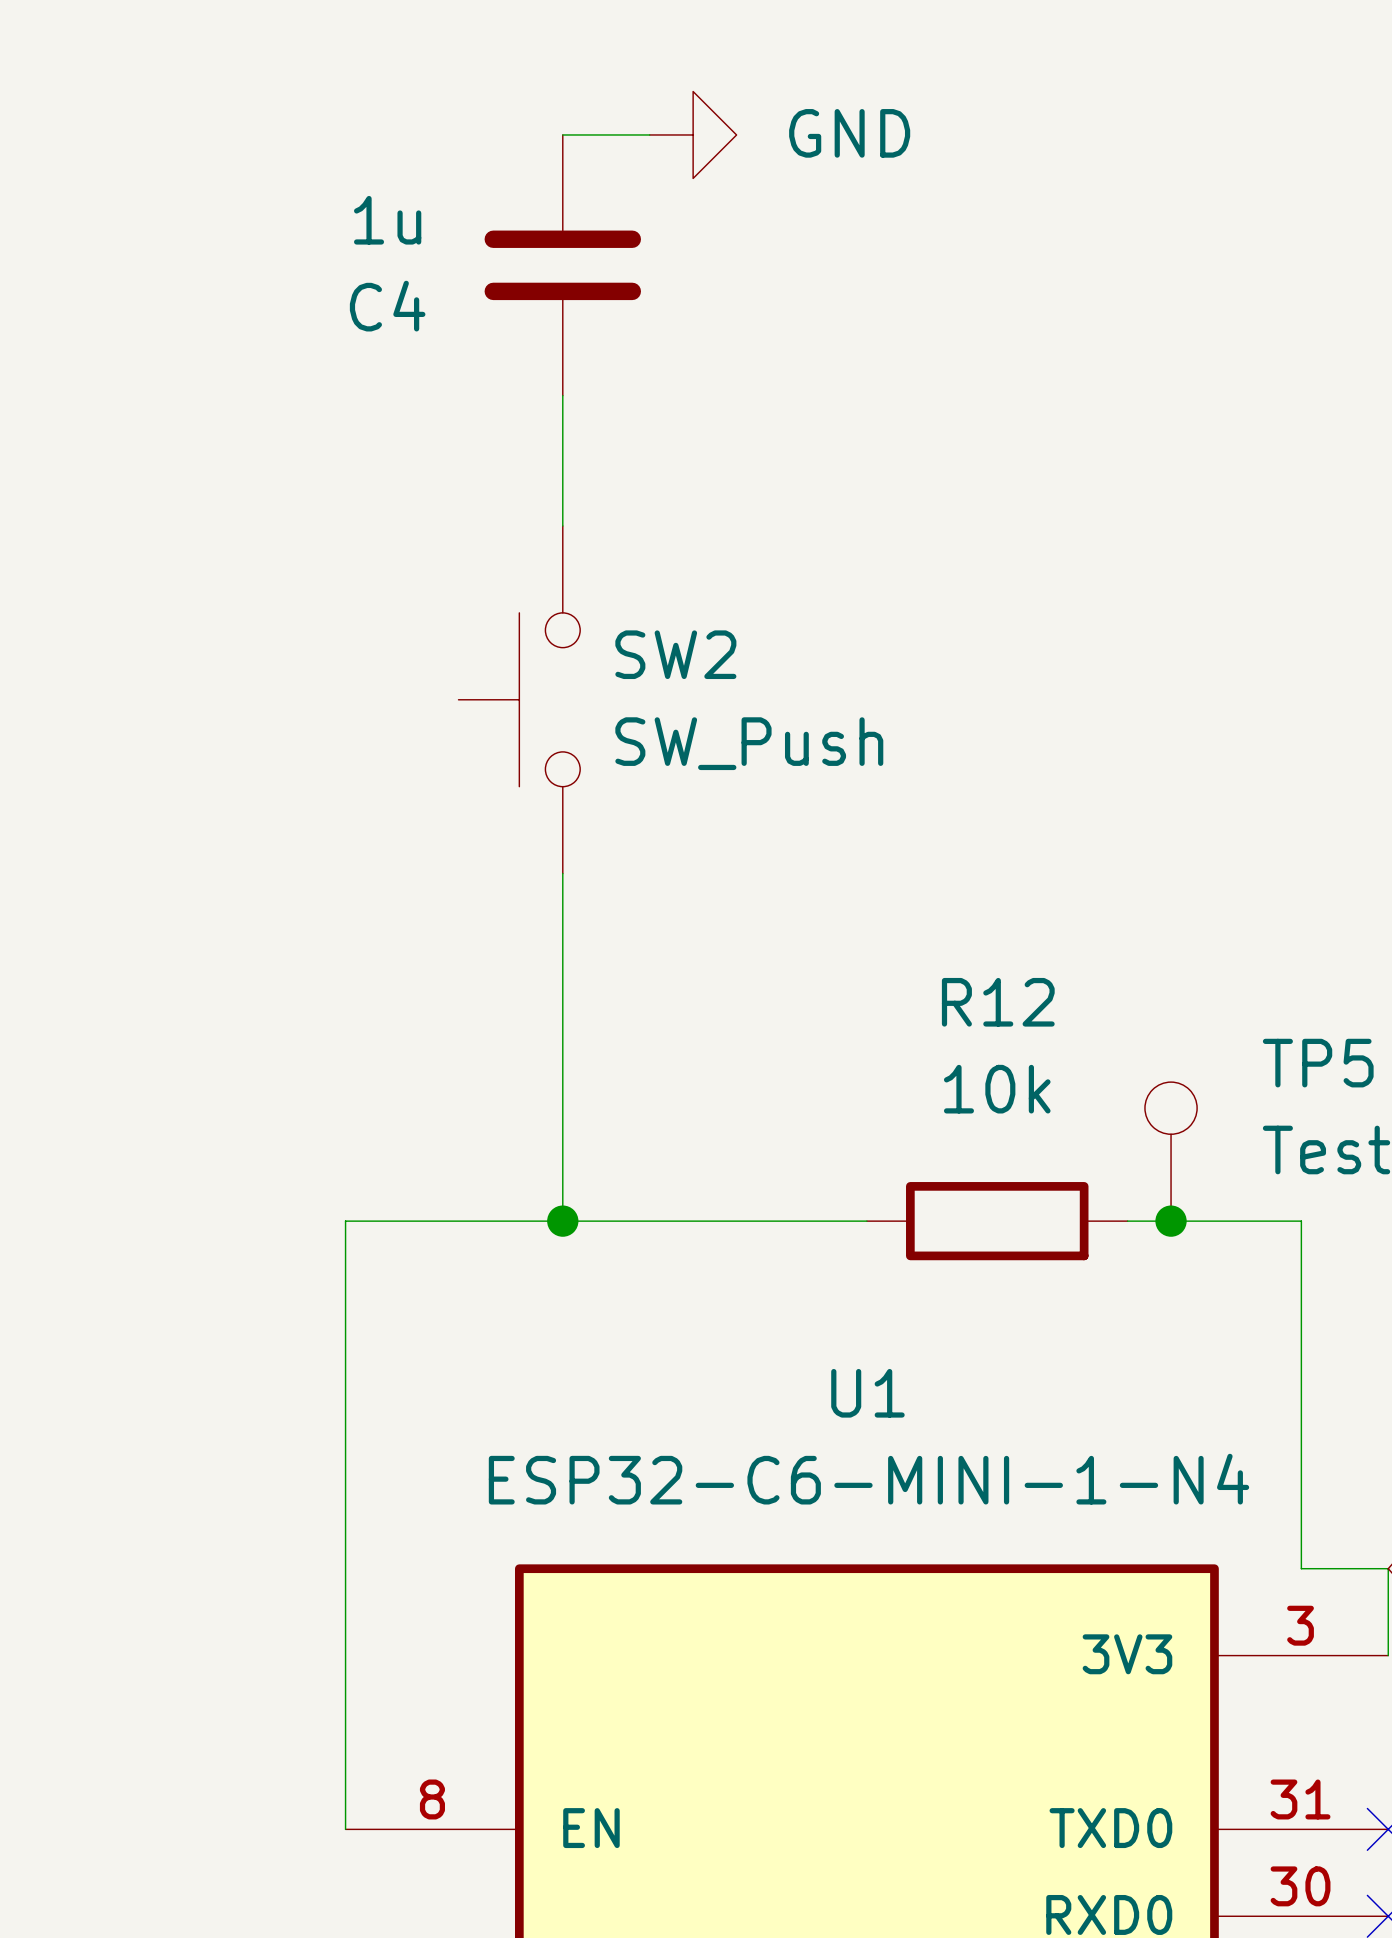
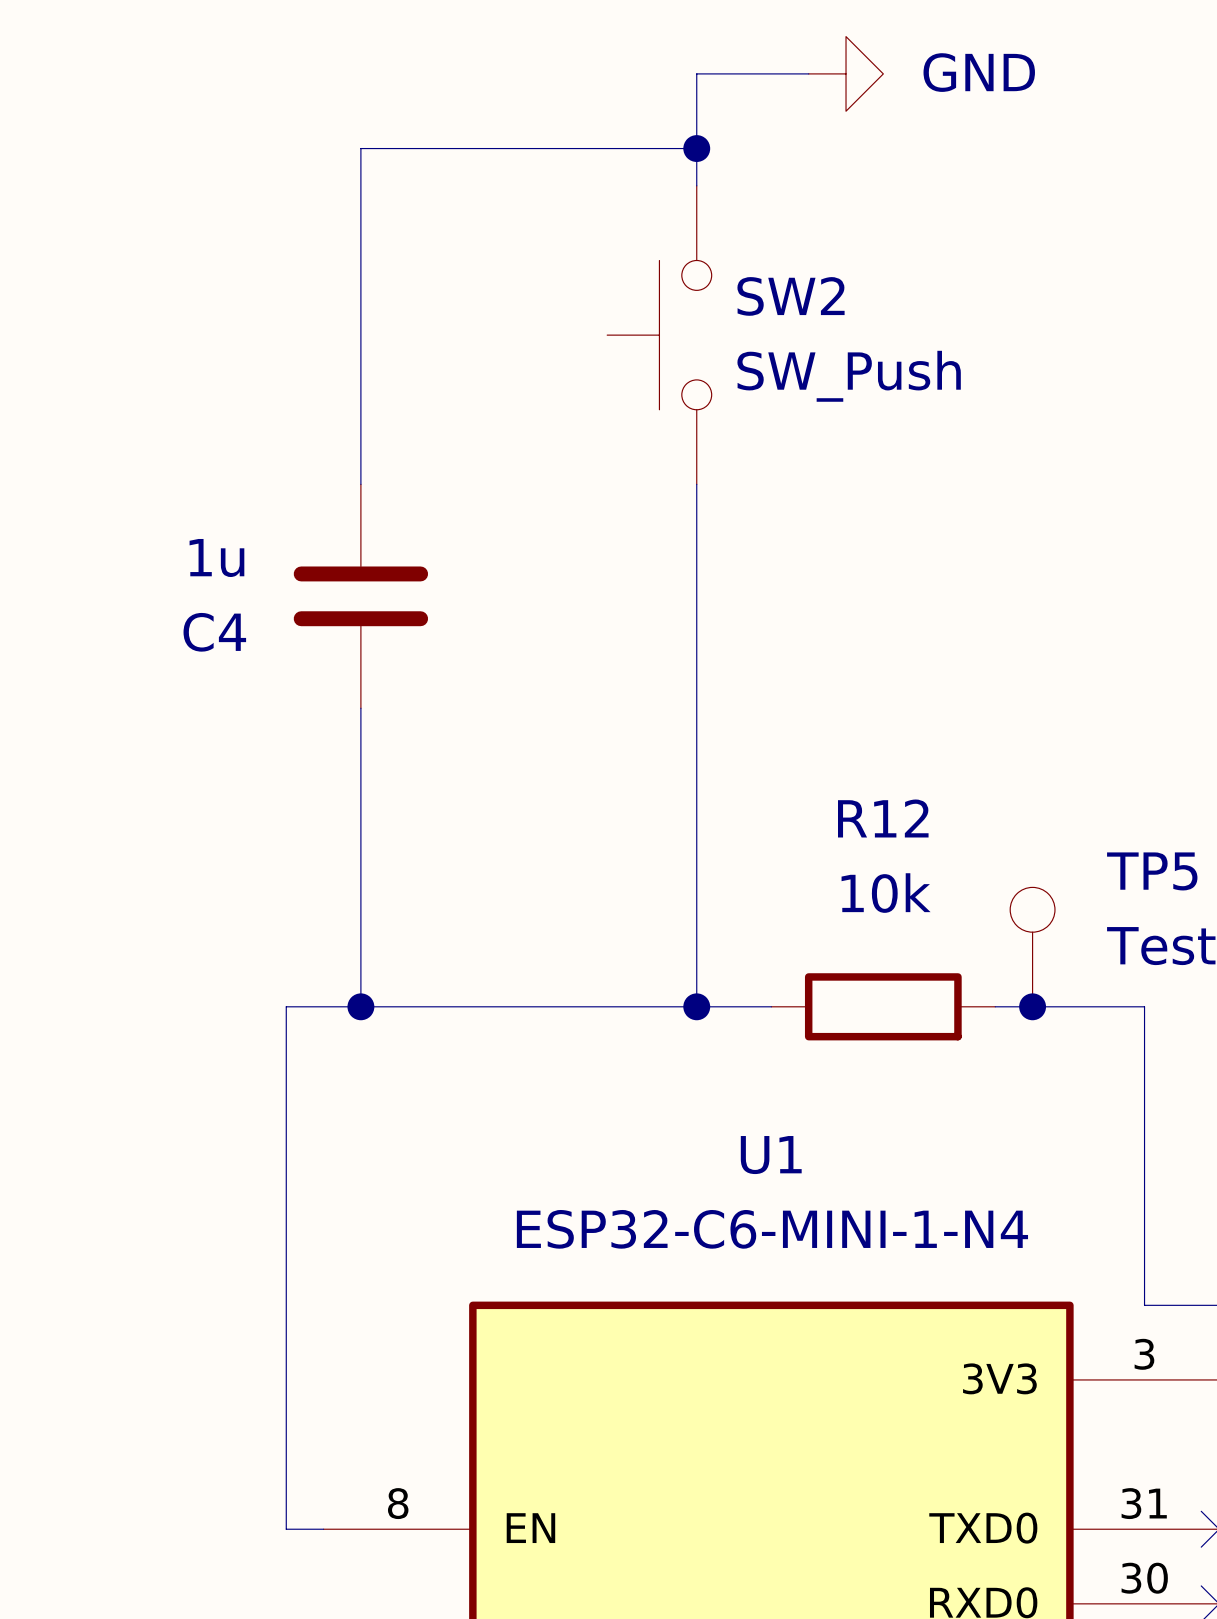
wire: (562, 134) (649, 134) -> none
power symbol position: GND (693, 134) -> GND (846, 73)
wire: none -> (808, 73) (696, 73) (696, 185)
wire: none -> (696, 148) (360, 148) (360, 484)
junction: none -> (696, 148)
C4 position: (562, 265) -> (360, 596)
wire: (562, 395) (562, 526) -> none
wire: none -> (696, 484) (696, 1006)
SW2 position: (519, 699) -> (659, 335)
wire: (562, 873) (562, 1221) -> (360, 708) (360, 1006)
wire: (345, 1221) (345, 1829) -> (323, 1006) (286, 1006) (286, 1529) (323, 1529)
junction: none -> (360, 1006)
junction: (562, 1221) -> none
junction: none -> (696, 1006)

